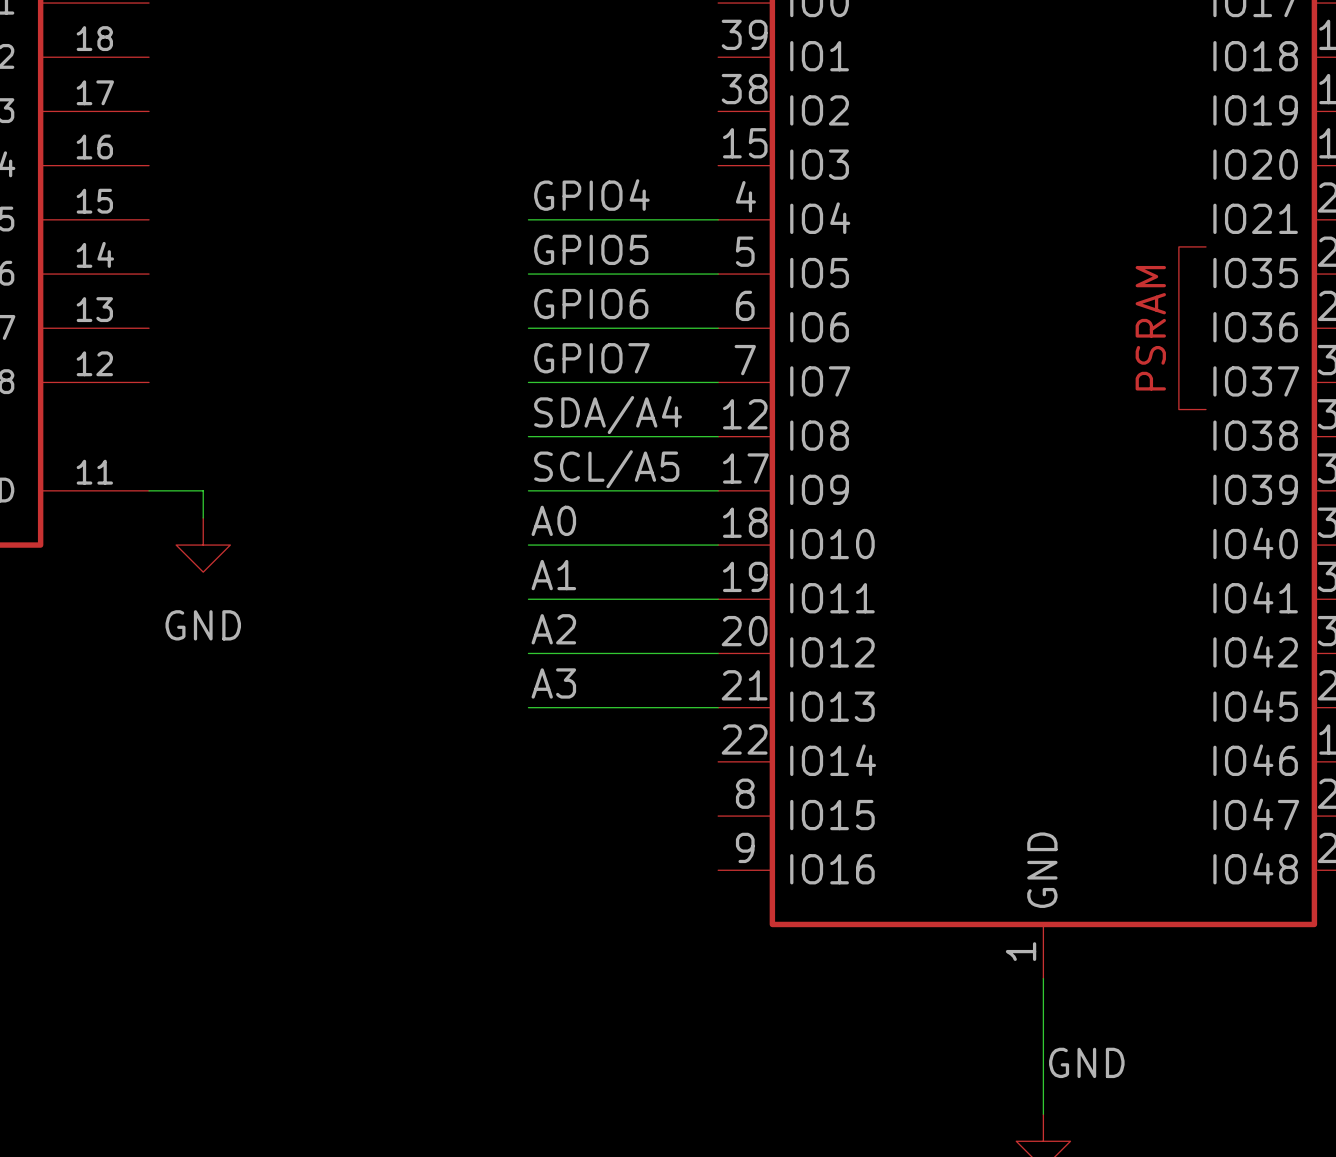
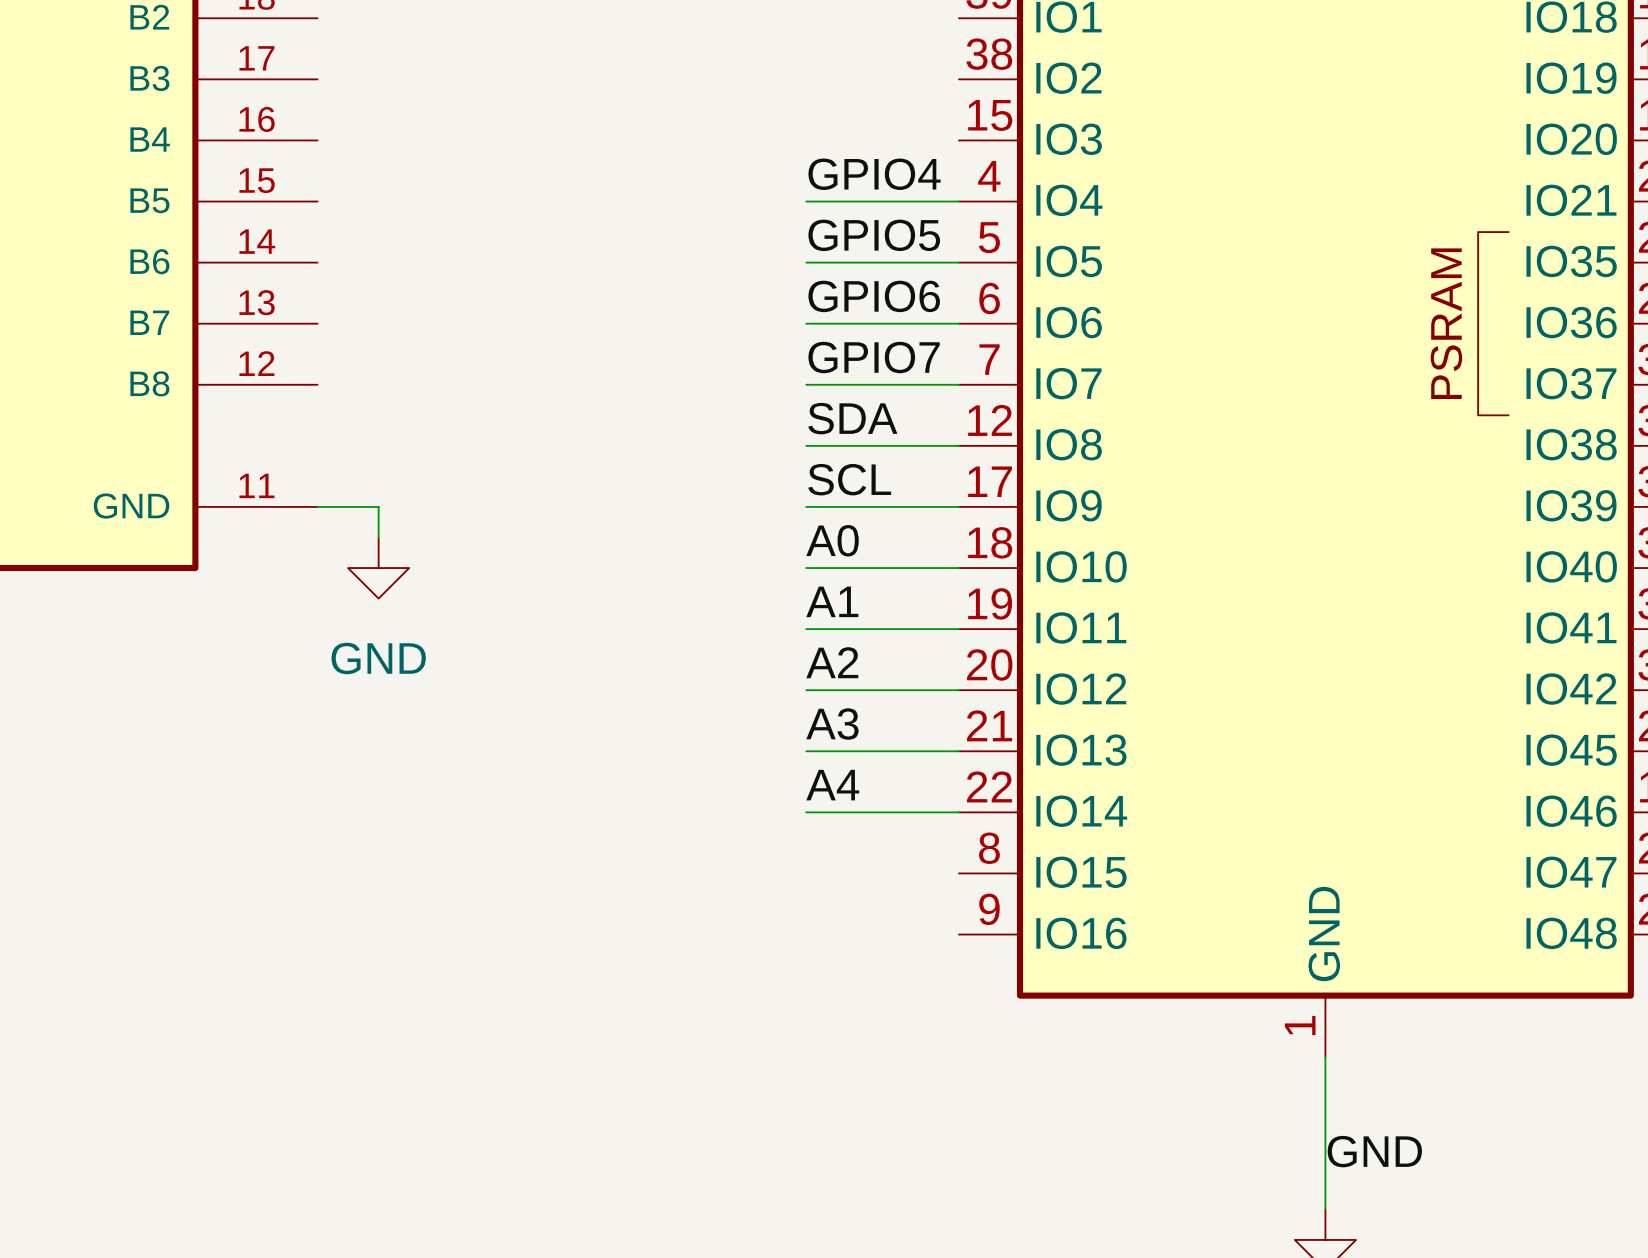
label position: GPIO4 (591, 195) -> GPIO4 (874, 174)
wire: (528, 219) (582, 219) -> none
label position: GPIO5 (591, 249) -> GPIO5 (874, 235)
wire: (528, 274) (582, 274) -> none
label position: GPIO6 (591, 304) -> GPIO6 (874, 296)
wire: (528, 328) (582, 328) -> none
label position: GPIO7 (591, 358) -> GPIO7 (874, 357)
wire: (528, 382) (582, 382) -> none
label: SDA/A4 (608, 415) -> SDA (852, 418)
wire: (528, 436) (582, 436) -> none
label: SCL/A5 (606, 469) -> SCL (849, 479)
wire: (528, 490) (582, 490) -> none
label position: A0 (553, 520) -> A0 (832, 540)
wire: (528, 545) (582, 545) -> none
label position: A1 (553, 575) -> A1 (832, 601)
wire: (528, 599) (582, 599) -> none
label position: A2 (553, 629) -> A2 (832, 662)
wire: (528, 653) (582, 653) -> none
label position: A3 (553, 683) -> A3 (832, 724)
wire: (528, 707) (582, 707) -> none
label: none -> A4 (832, 785)
wire: none -> (806, 812) (958, 812)

